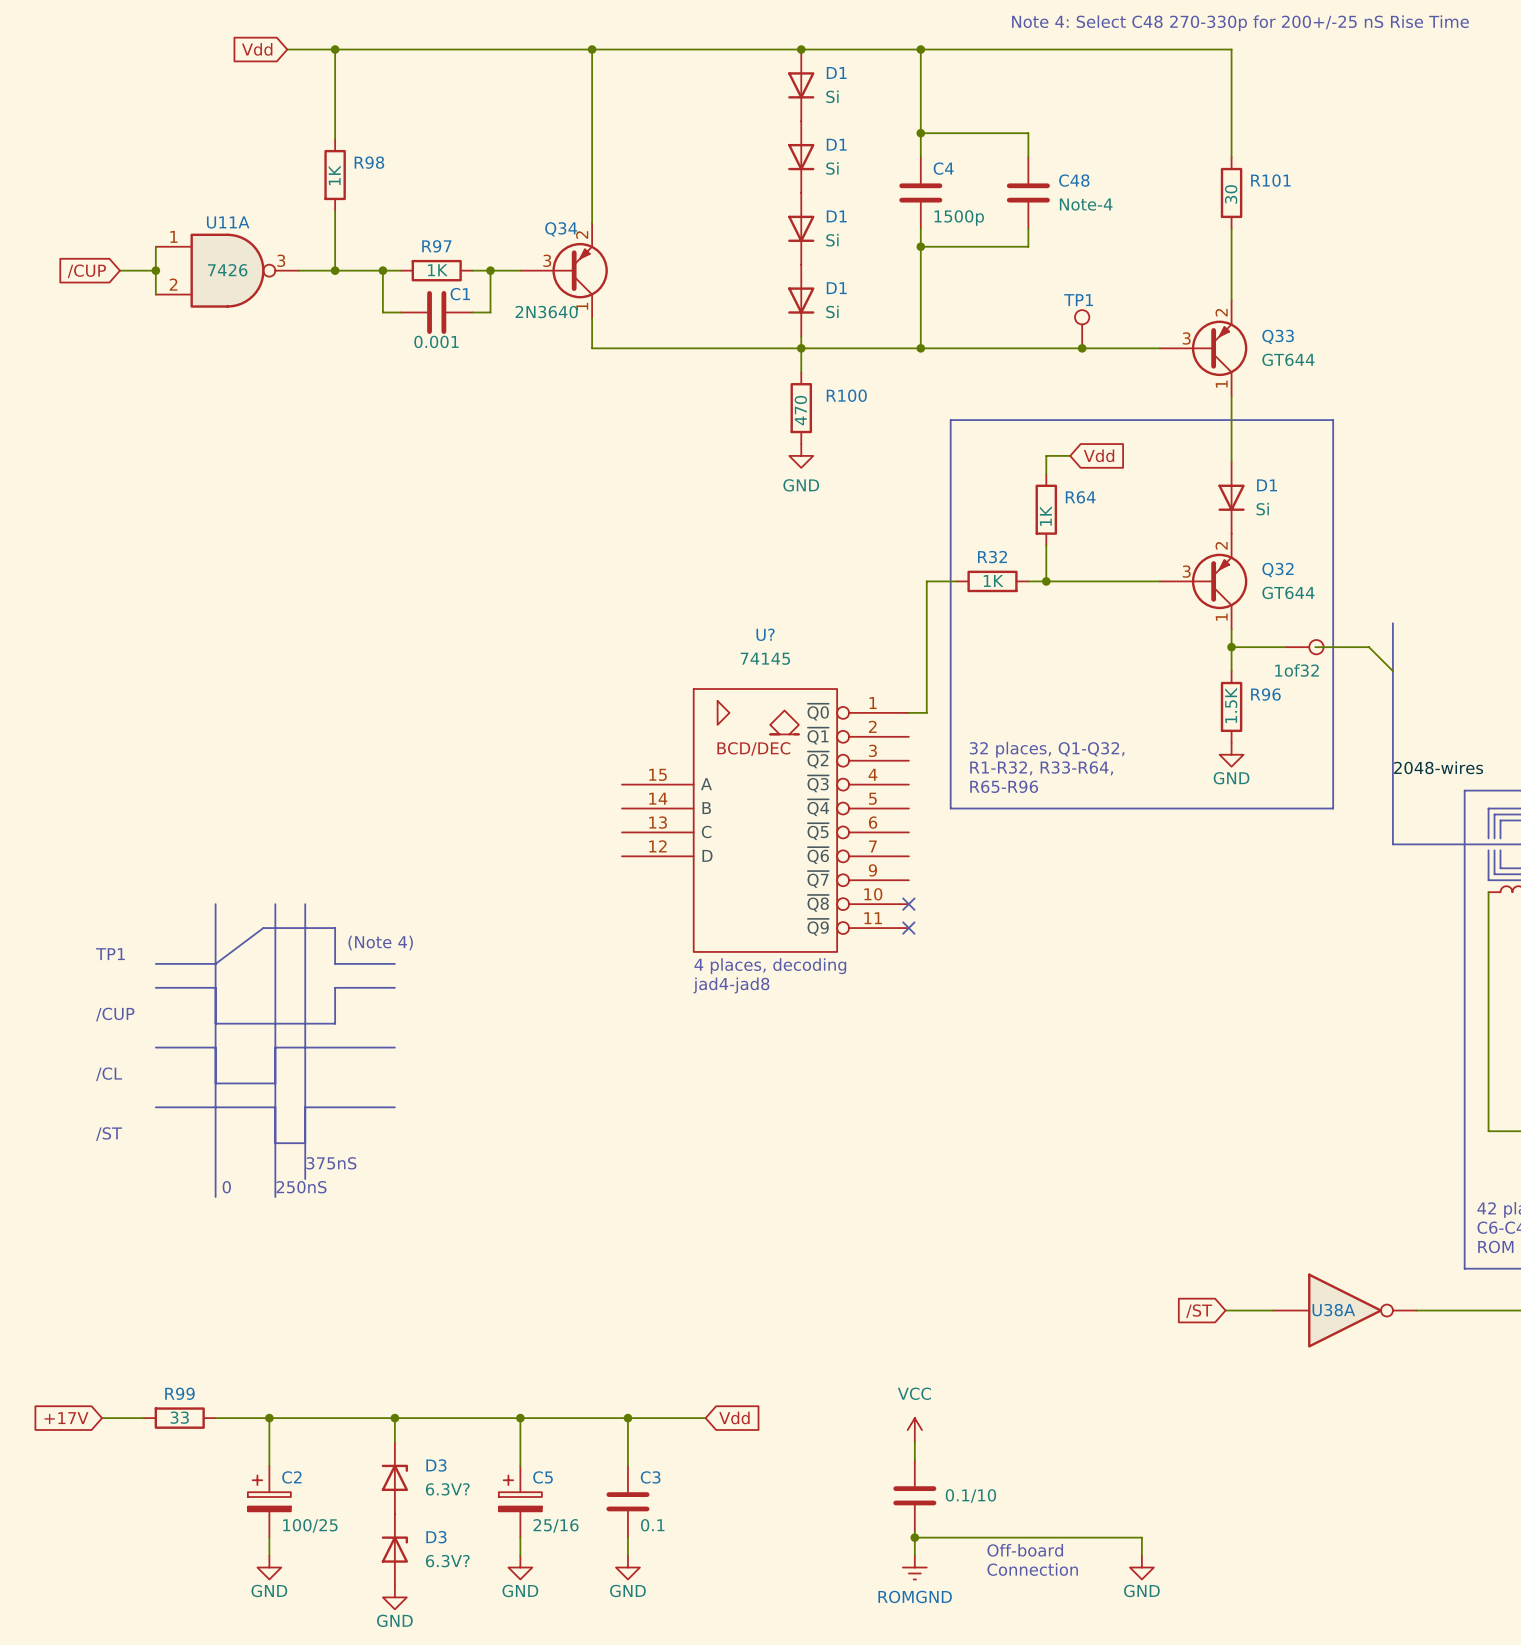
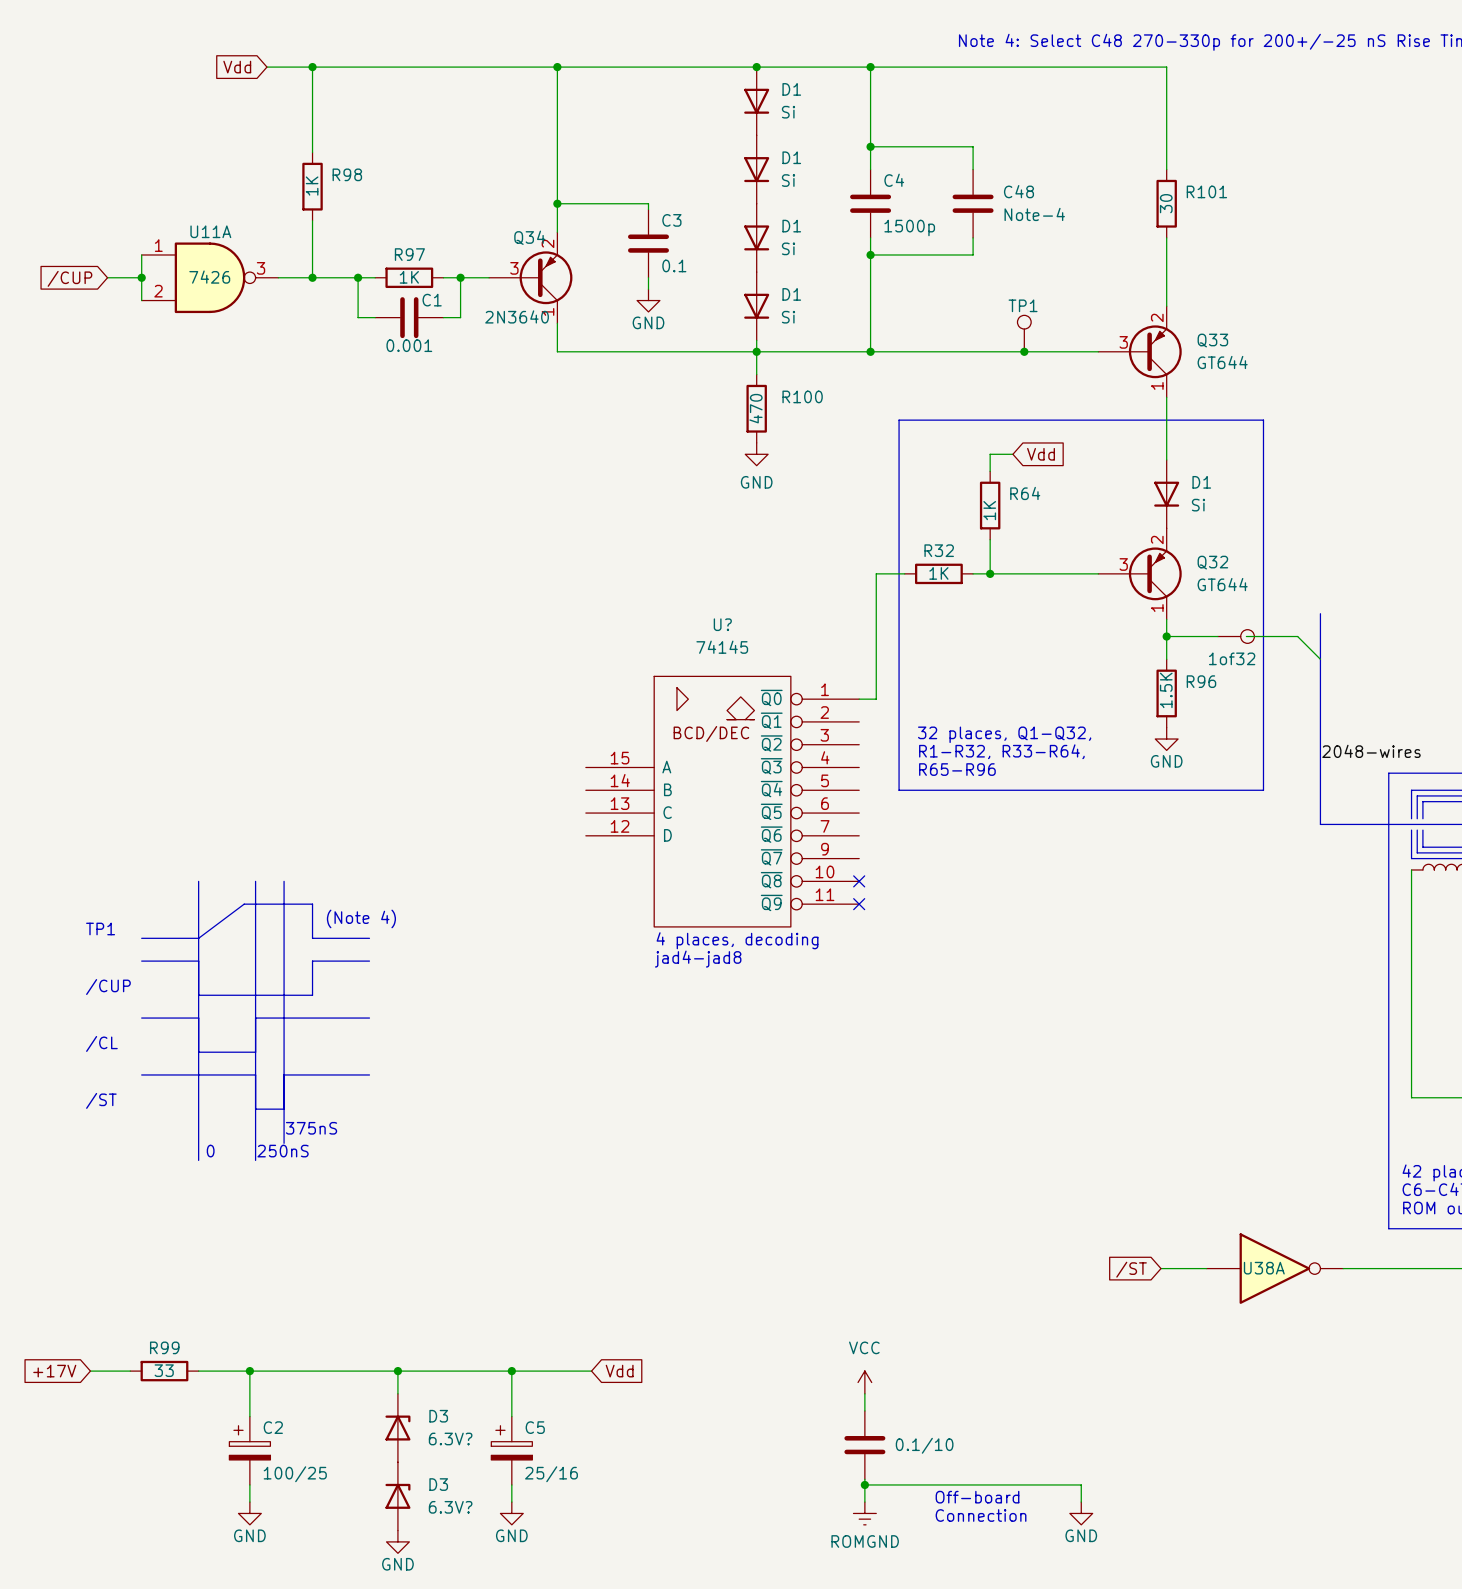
wire: none -> (557, 203) (648, 203) (648, 209)
junction: none -> (557, 203)
wire: none -> (648, 277) (648, 289)
power symbol: none -> GND (648, 300)
global label position: Vdd (734, 1417) -> Vdd (619, 1371)
wire: (394, 1418) (394, 1442) -> (397, 1371) (397, 1393)
junction position: (394, 1418) -> (397, 1371)
wire: (520, 1418) (520, 1465) -> (511, 1371) (511, 1416)
junction position: (520, 1418) -> (511, 1371)
junction: (627, 1418) -> none
wire: (705, 1418) (627, 1418) (627, 1465) -> none
D3 position: (394, 1477) -> (397, 1428)
C5 position: (520, 1501) -> (511, 1450)
C3 position: (627, 1501) -> (648, 243)
wire: (520, 1537) (520, 1555) -> (511, 1484) (511, 1502)
wire: (627, 1537) (627, 1555) -> none
D3 position: (394, 1549) -> (397, 1496)
power symbol position: GND (520, 1567) -> GND (511, 1513)
power symbol: GND (627, 1567) -> none
power symbol position: GND (394, 1597) -> GND (397, 1541)

